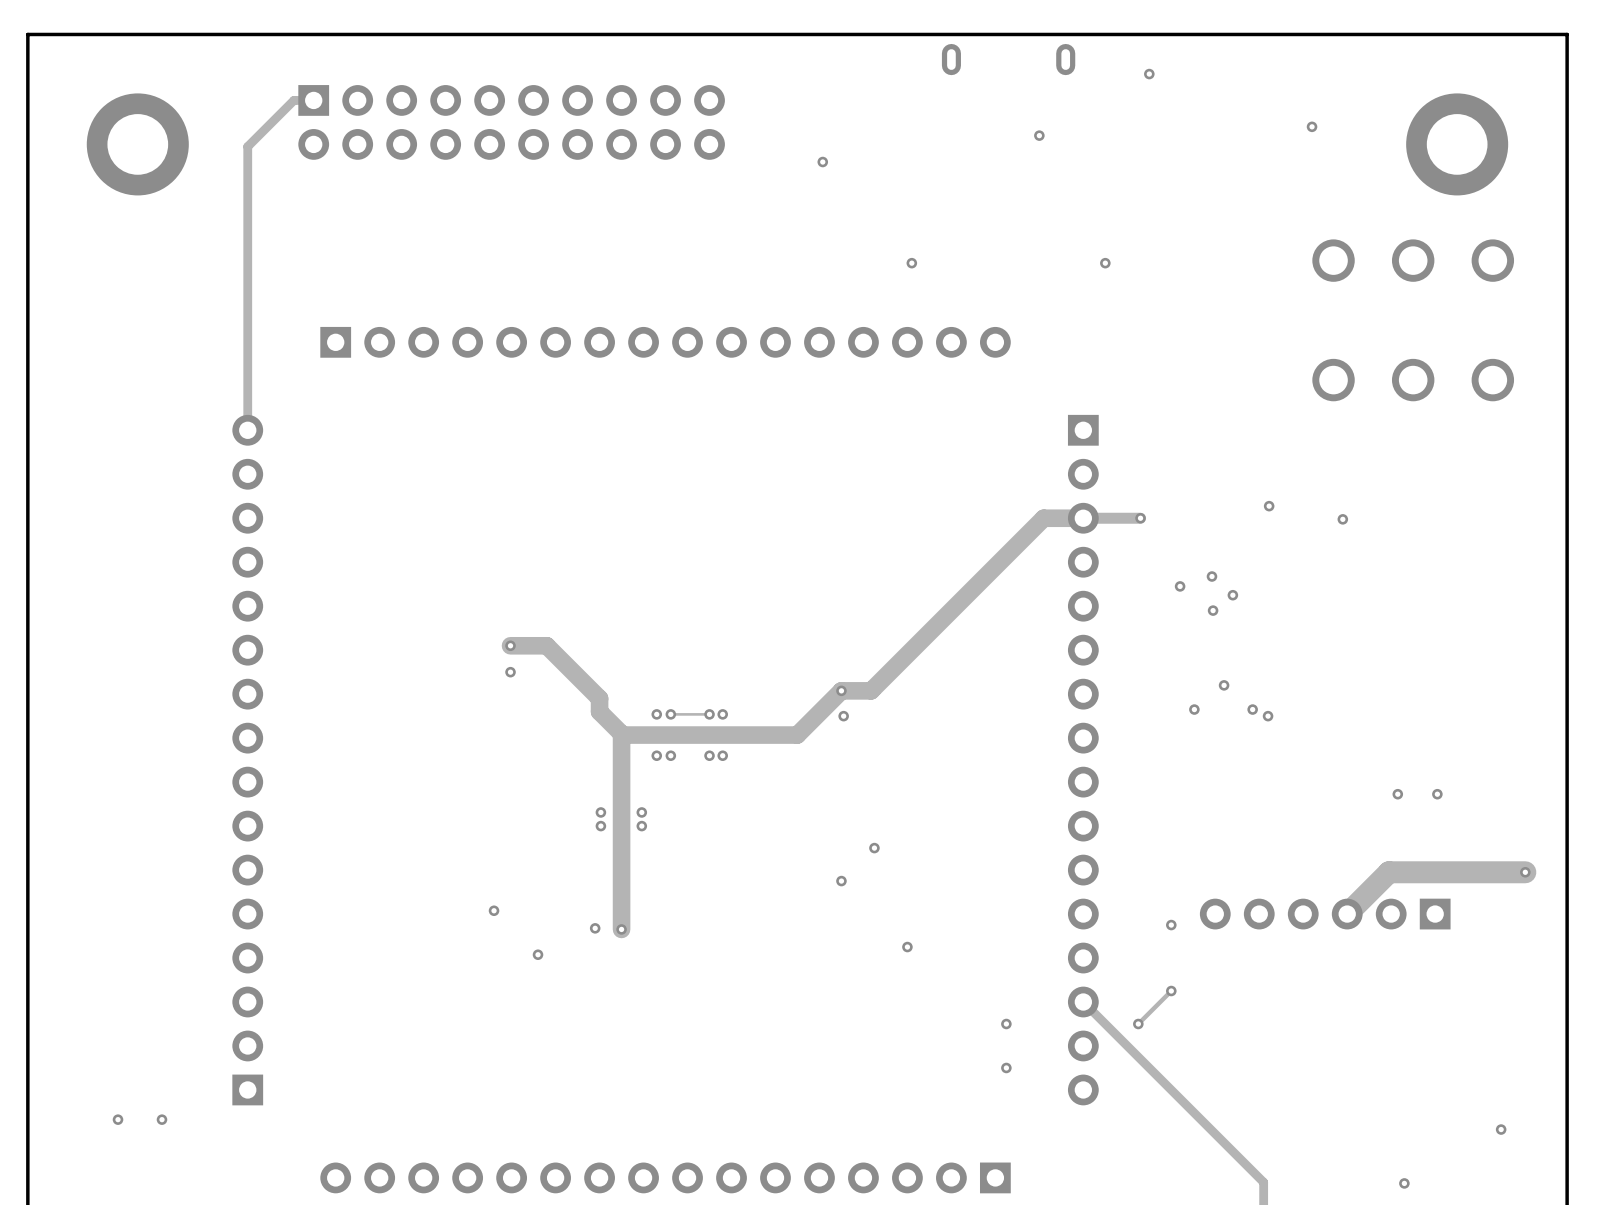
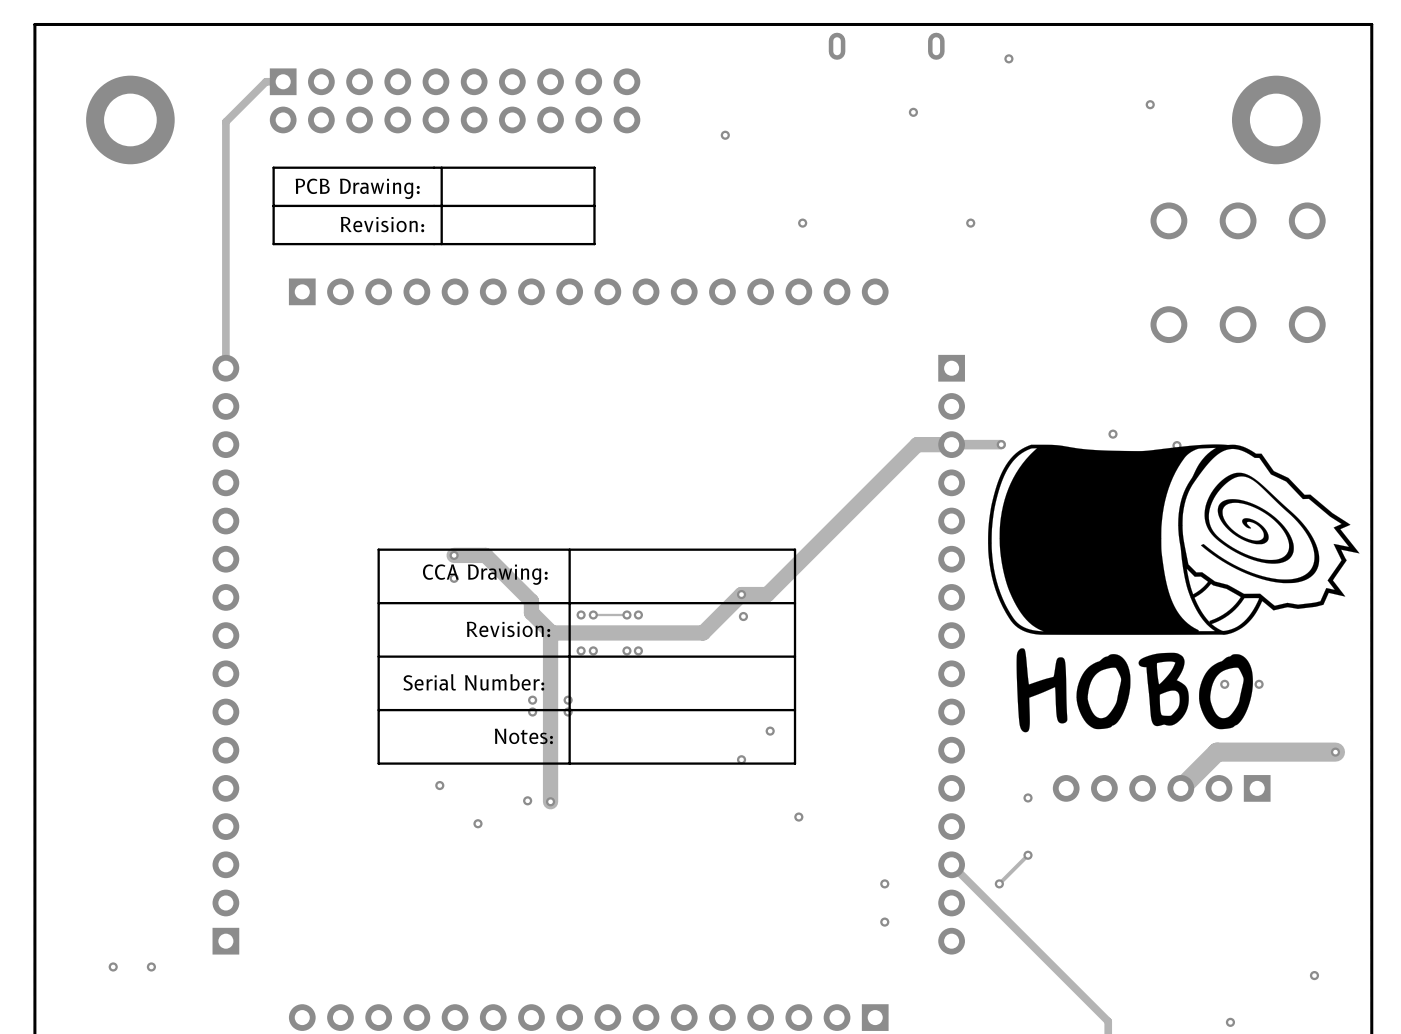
drawing: none -> [272, 166, 596, 246]
drawing: none -> [988, 444, 1360, 733]
drawing: none -> [377, 548, 797, 765]

